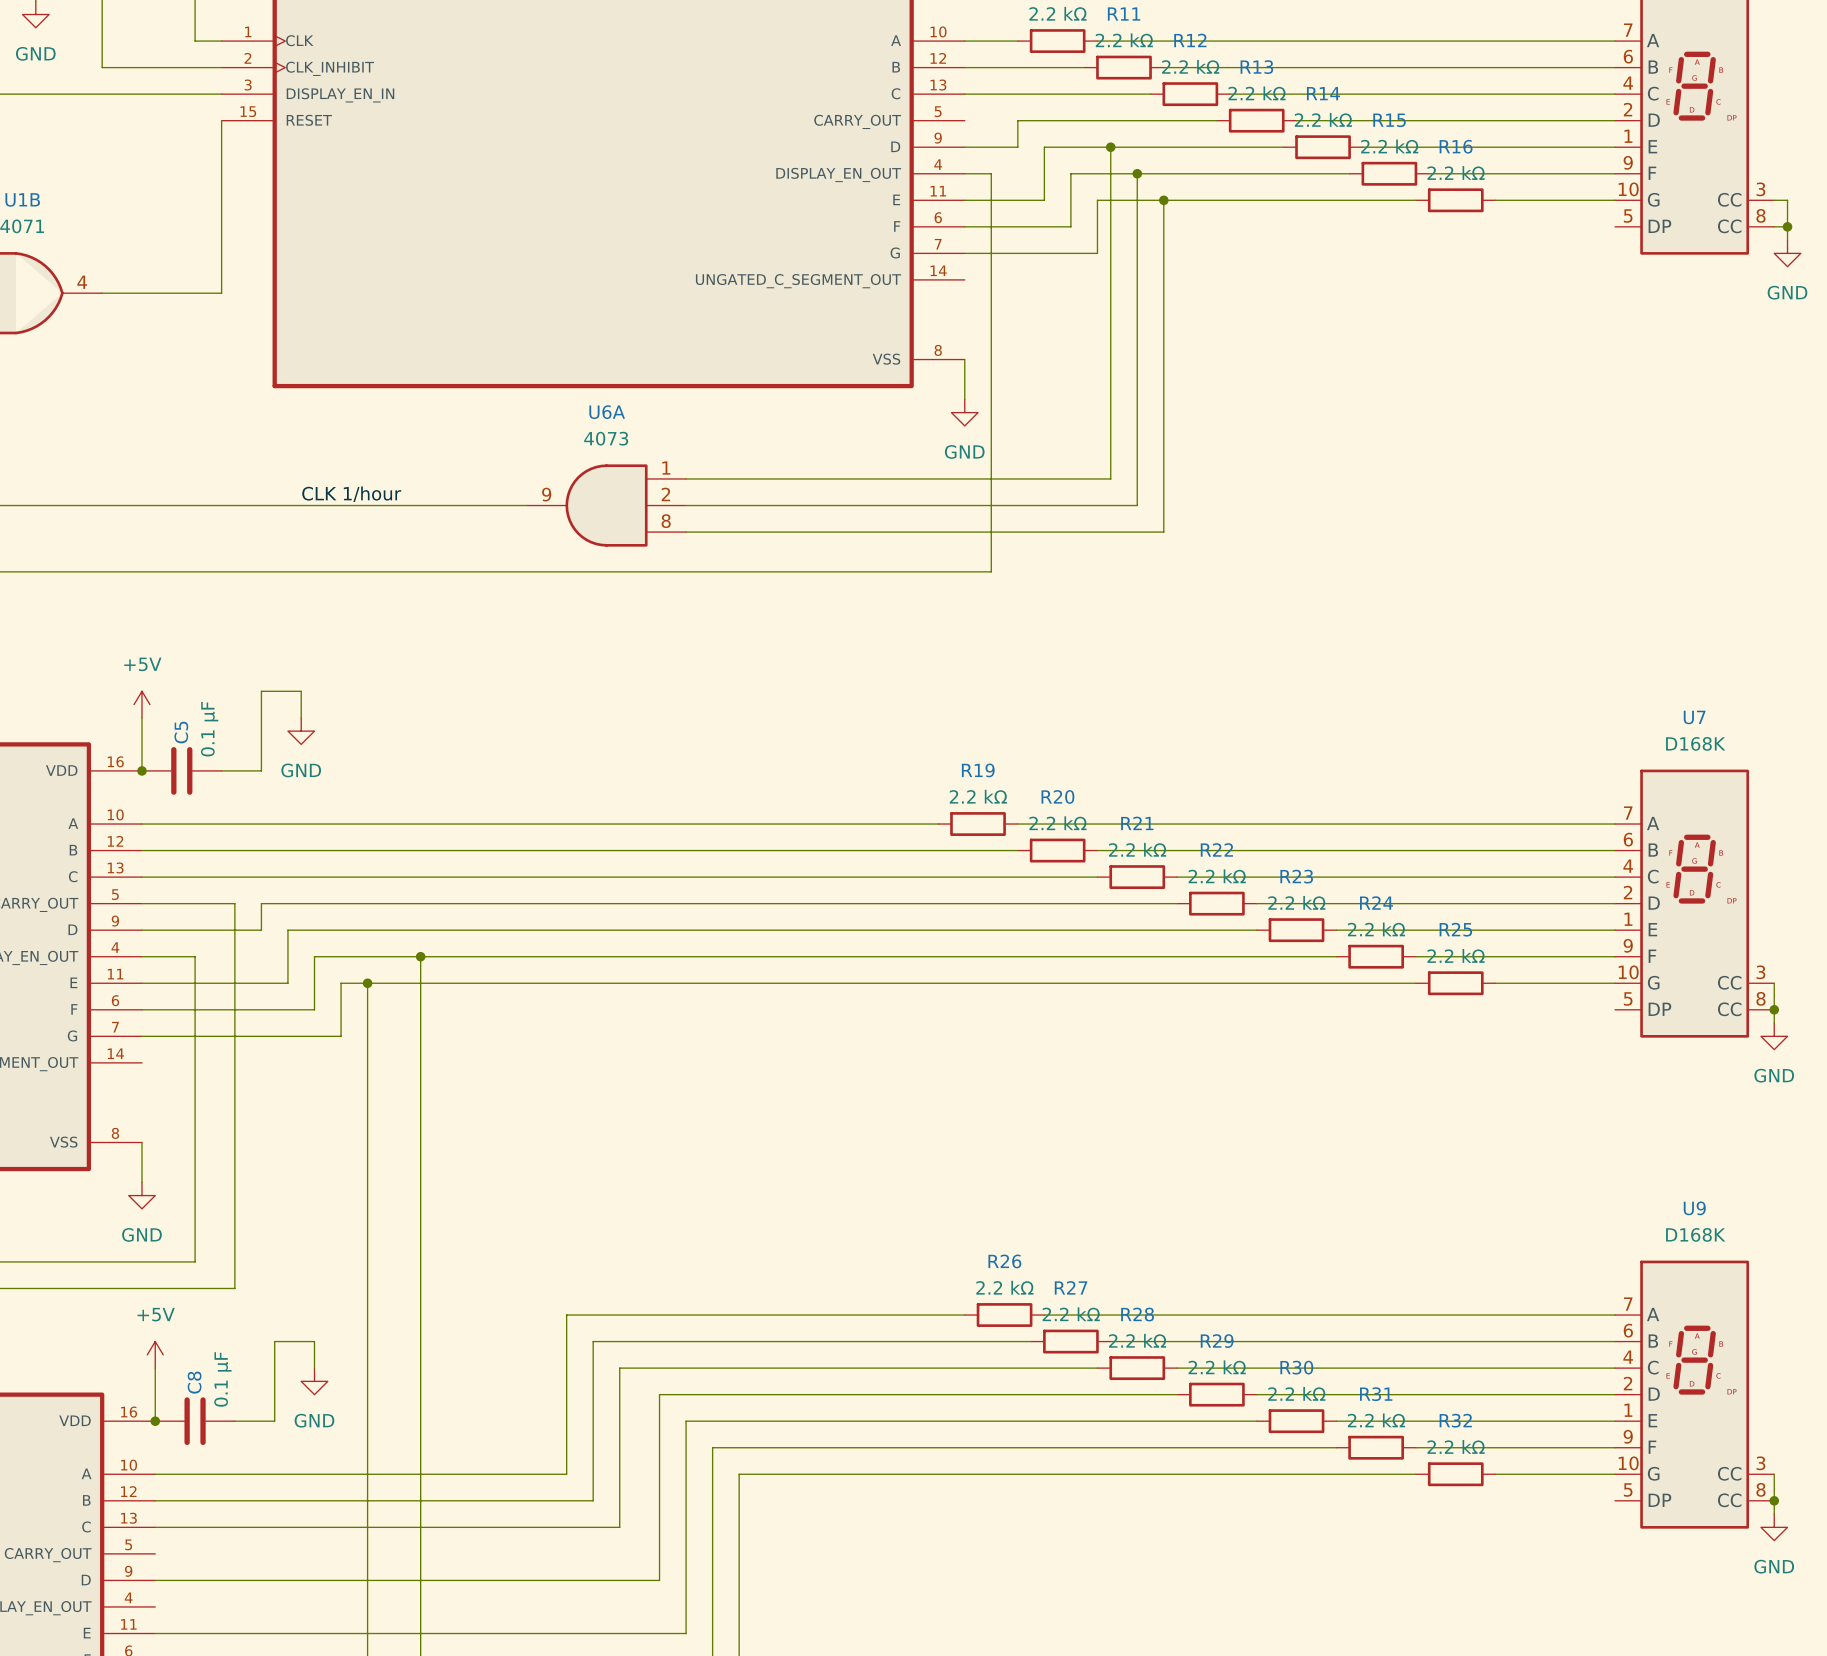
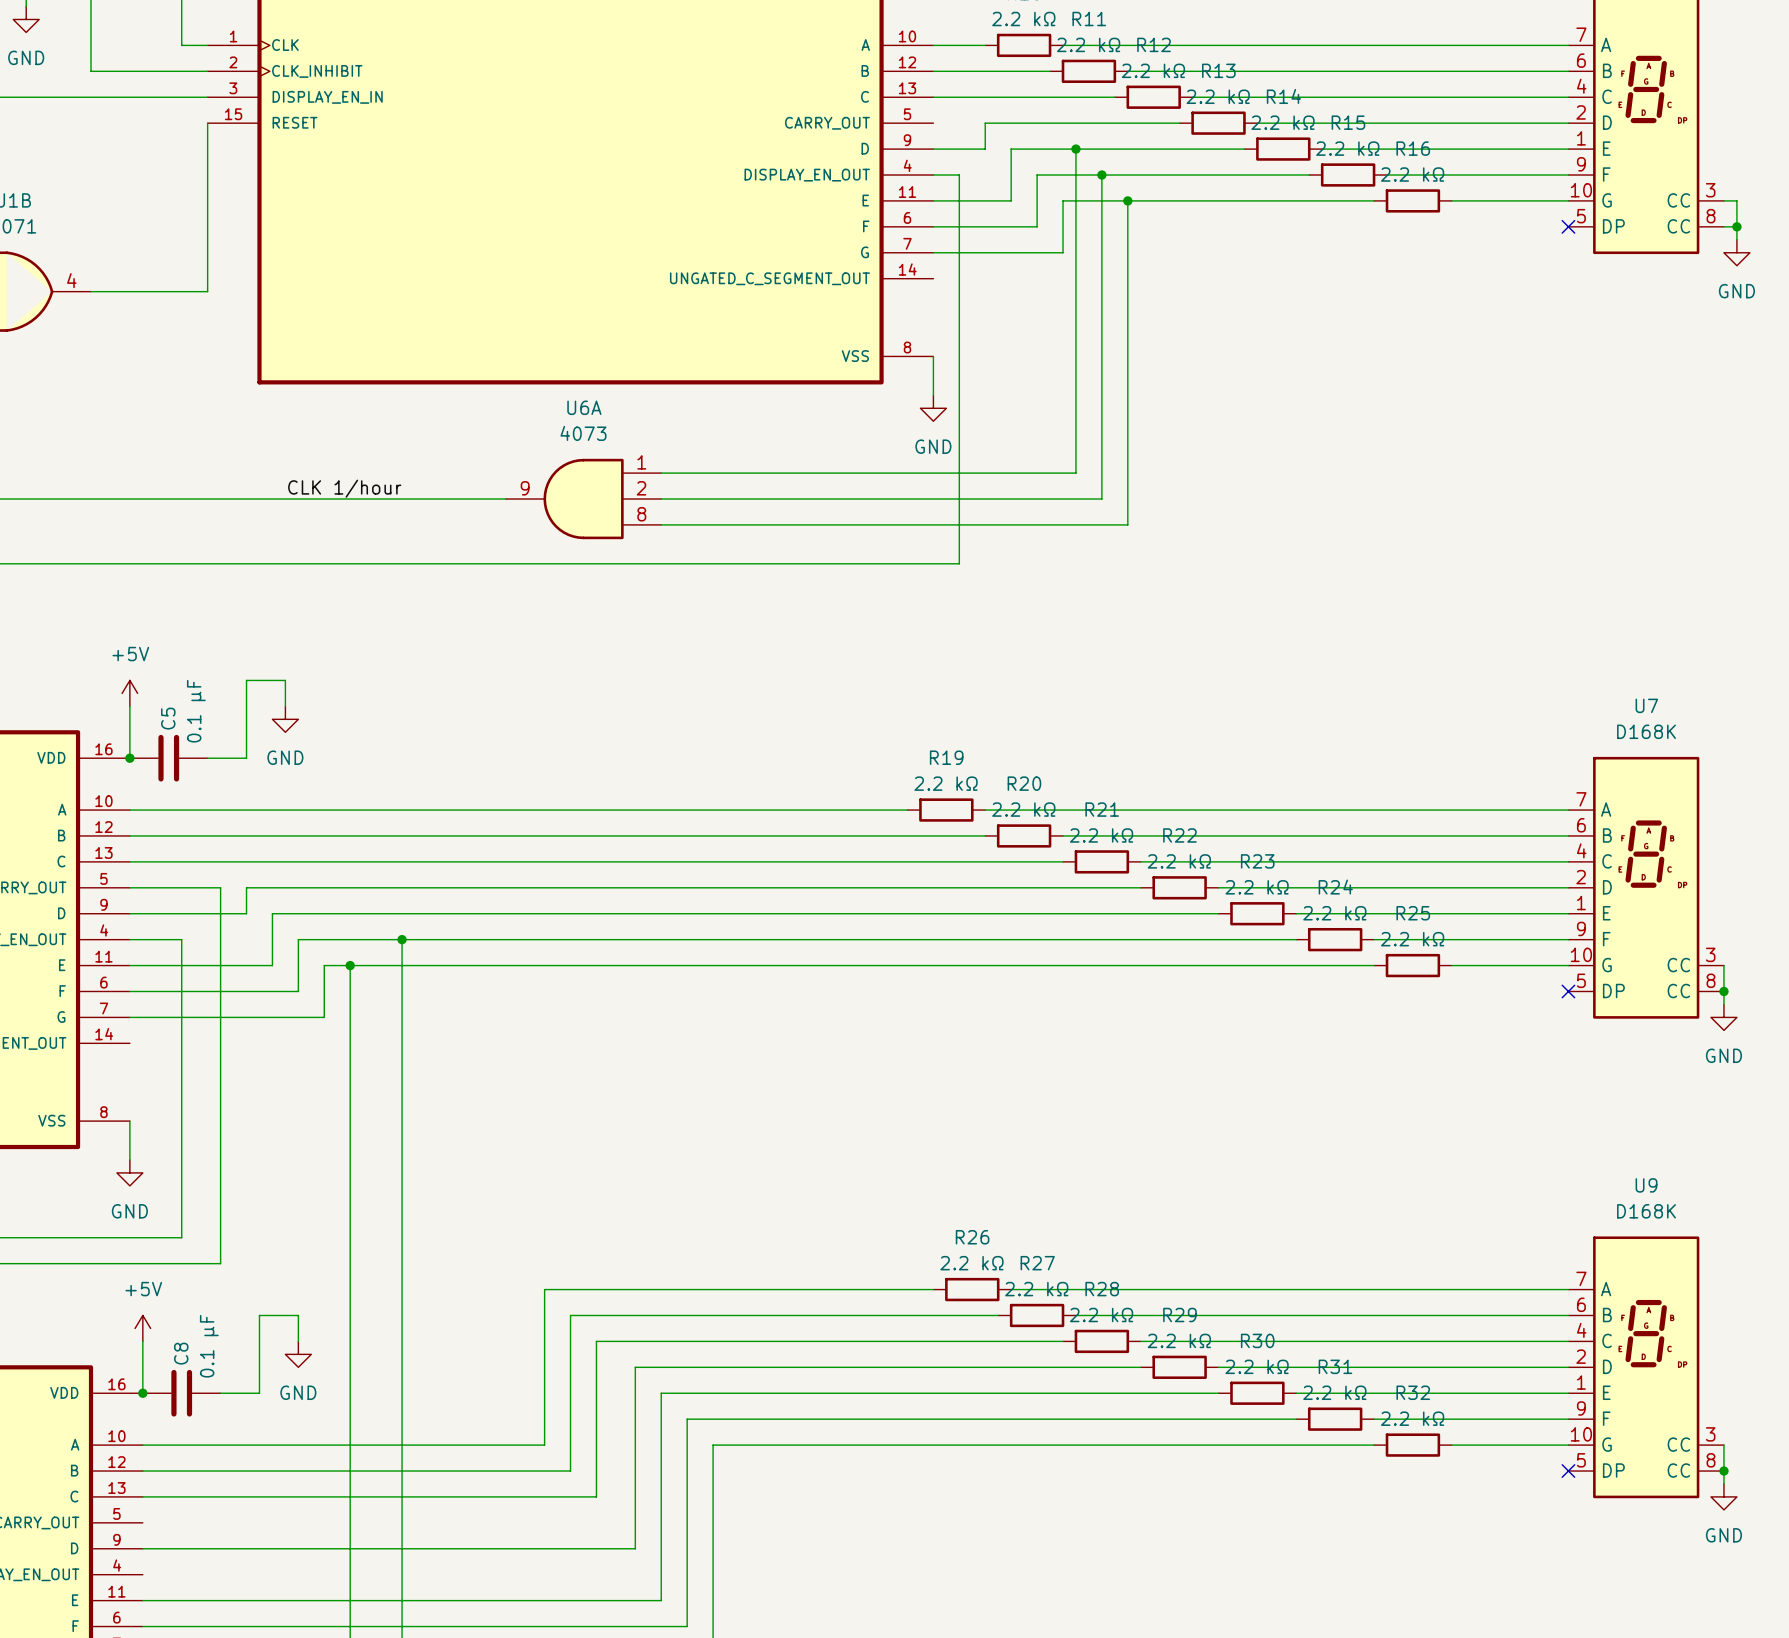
no-connect mark: none -> (1568, 226)
no-connect mark: none -> (1568, 991)
no-connect mark: none -> (1568, 1471)

